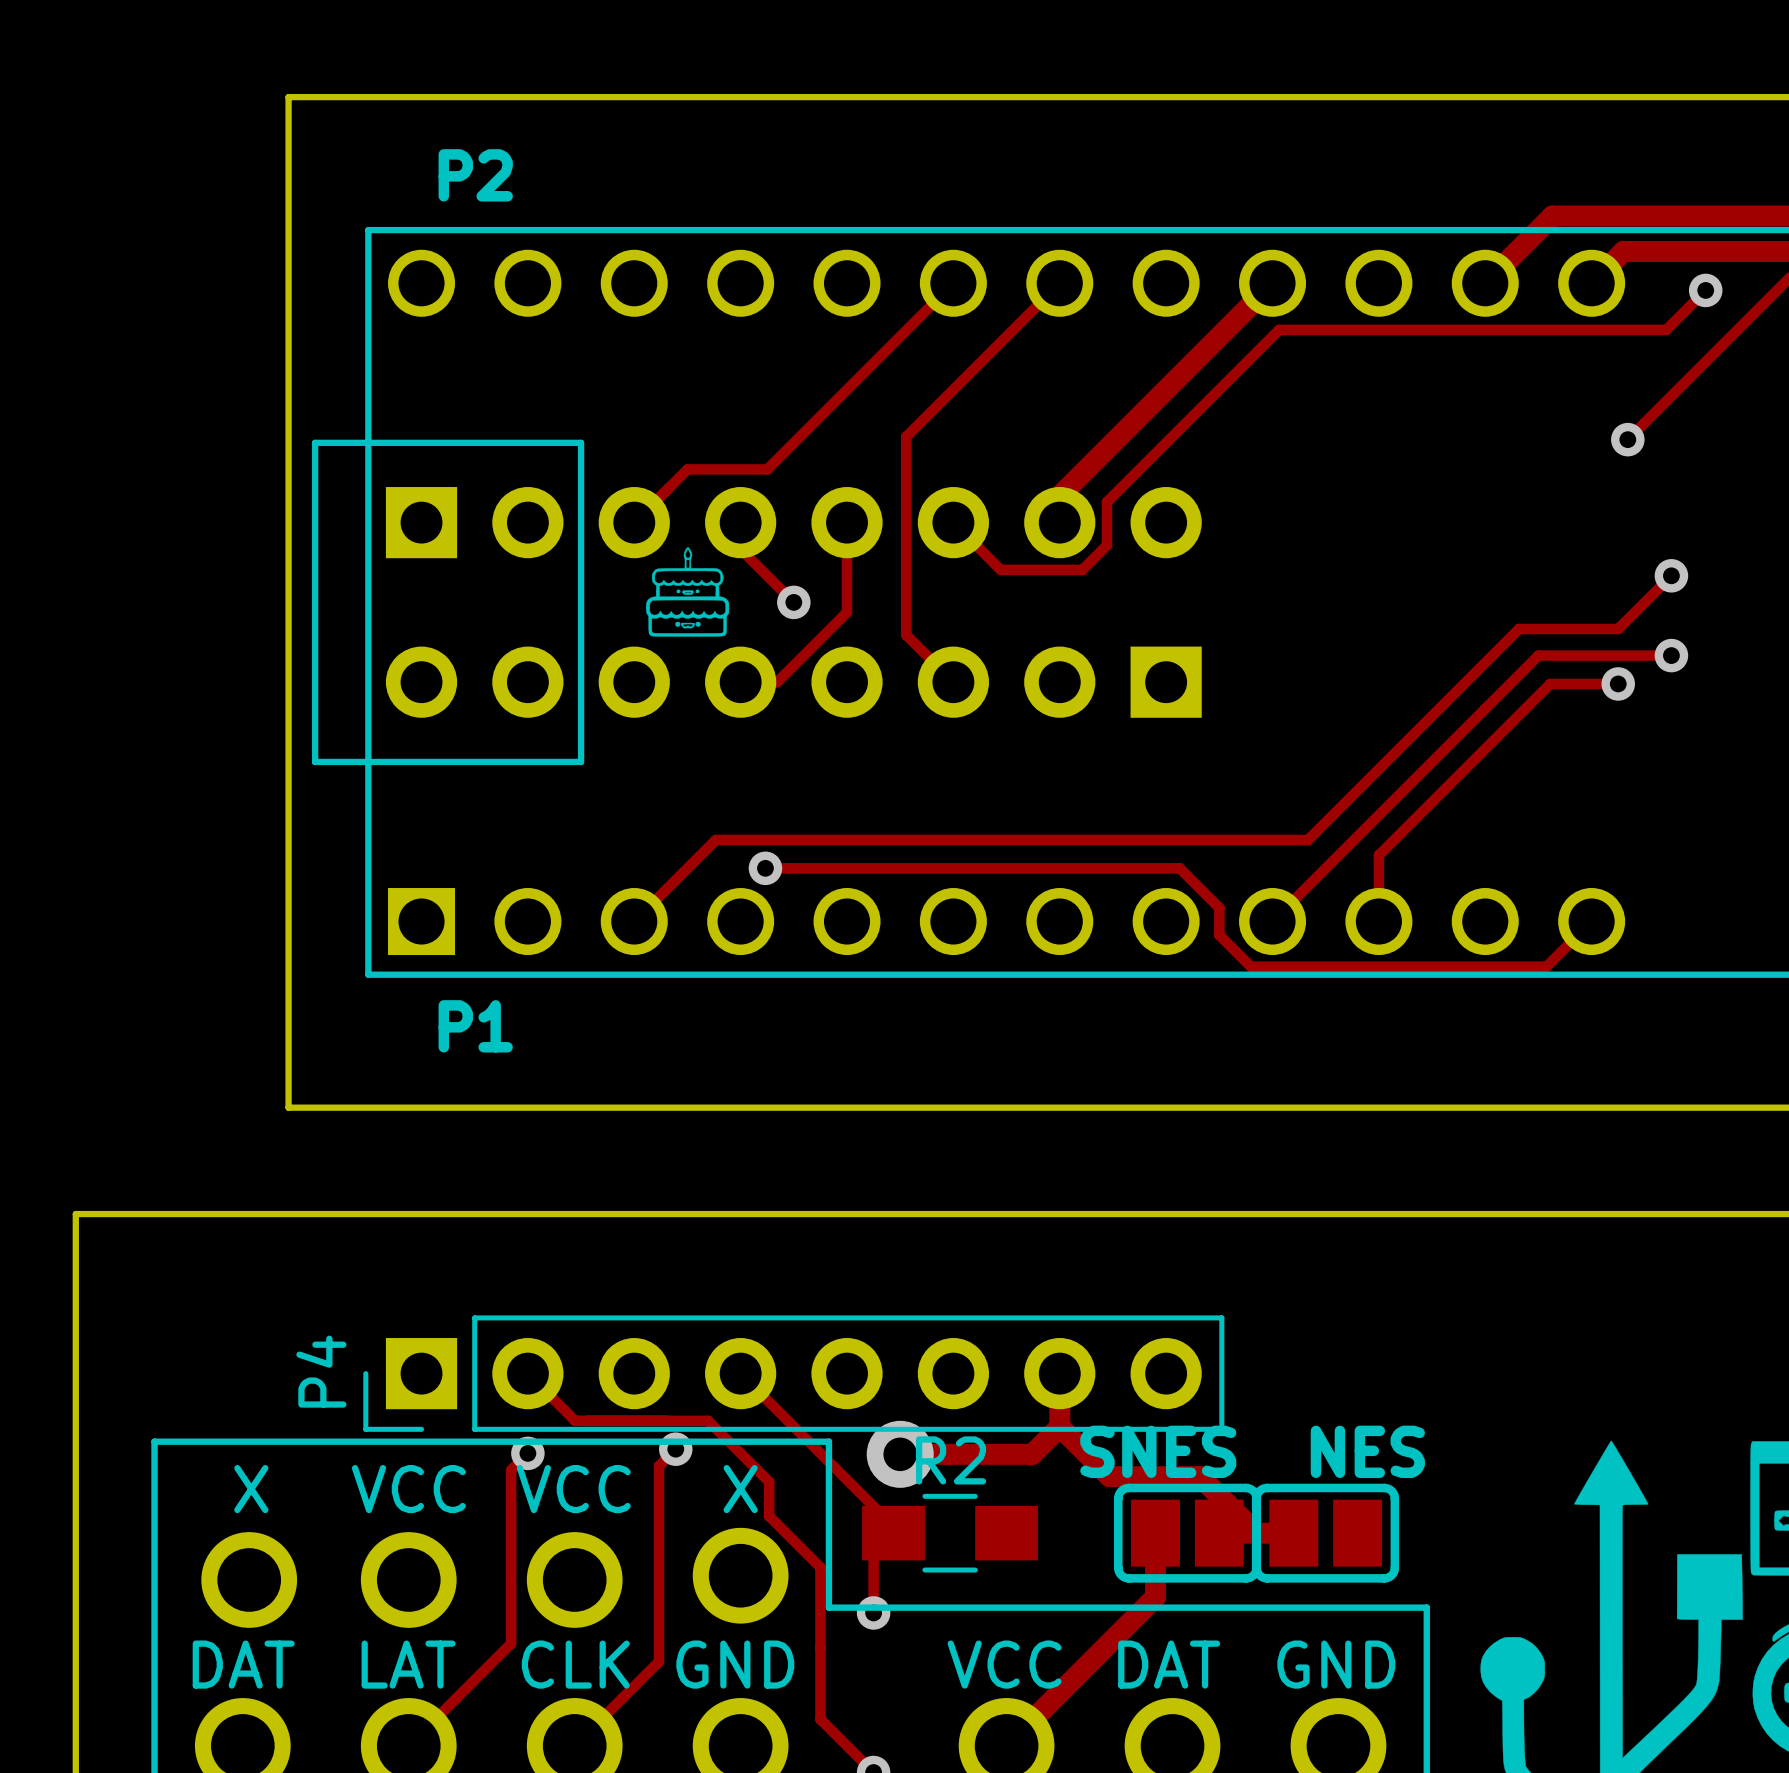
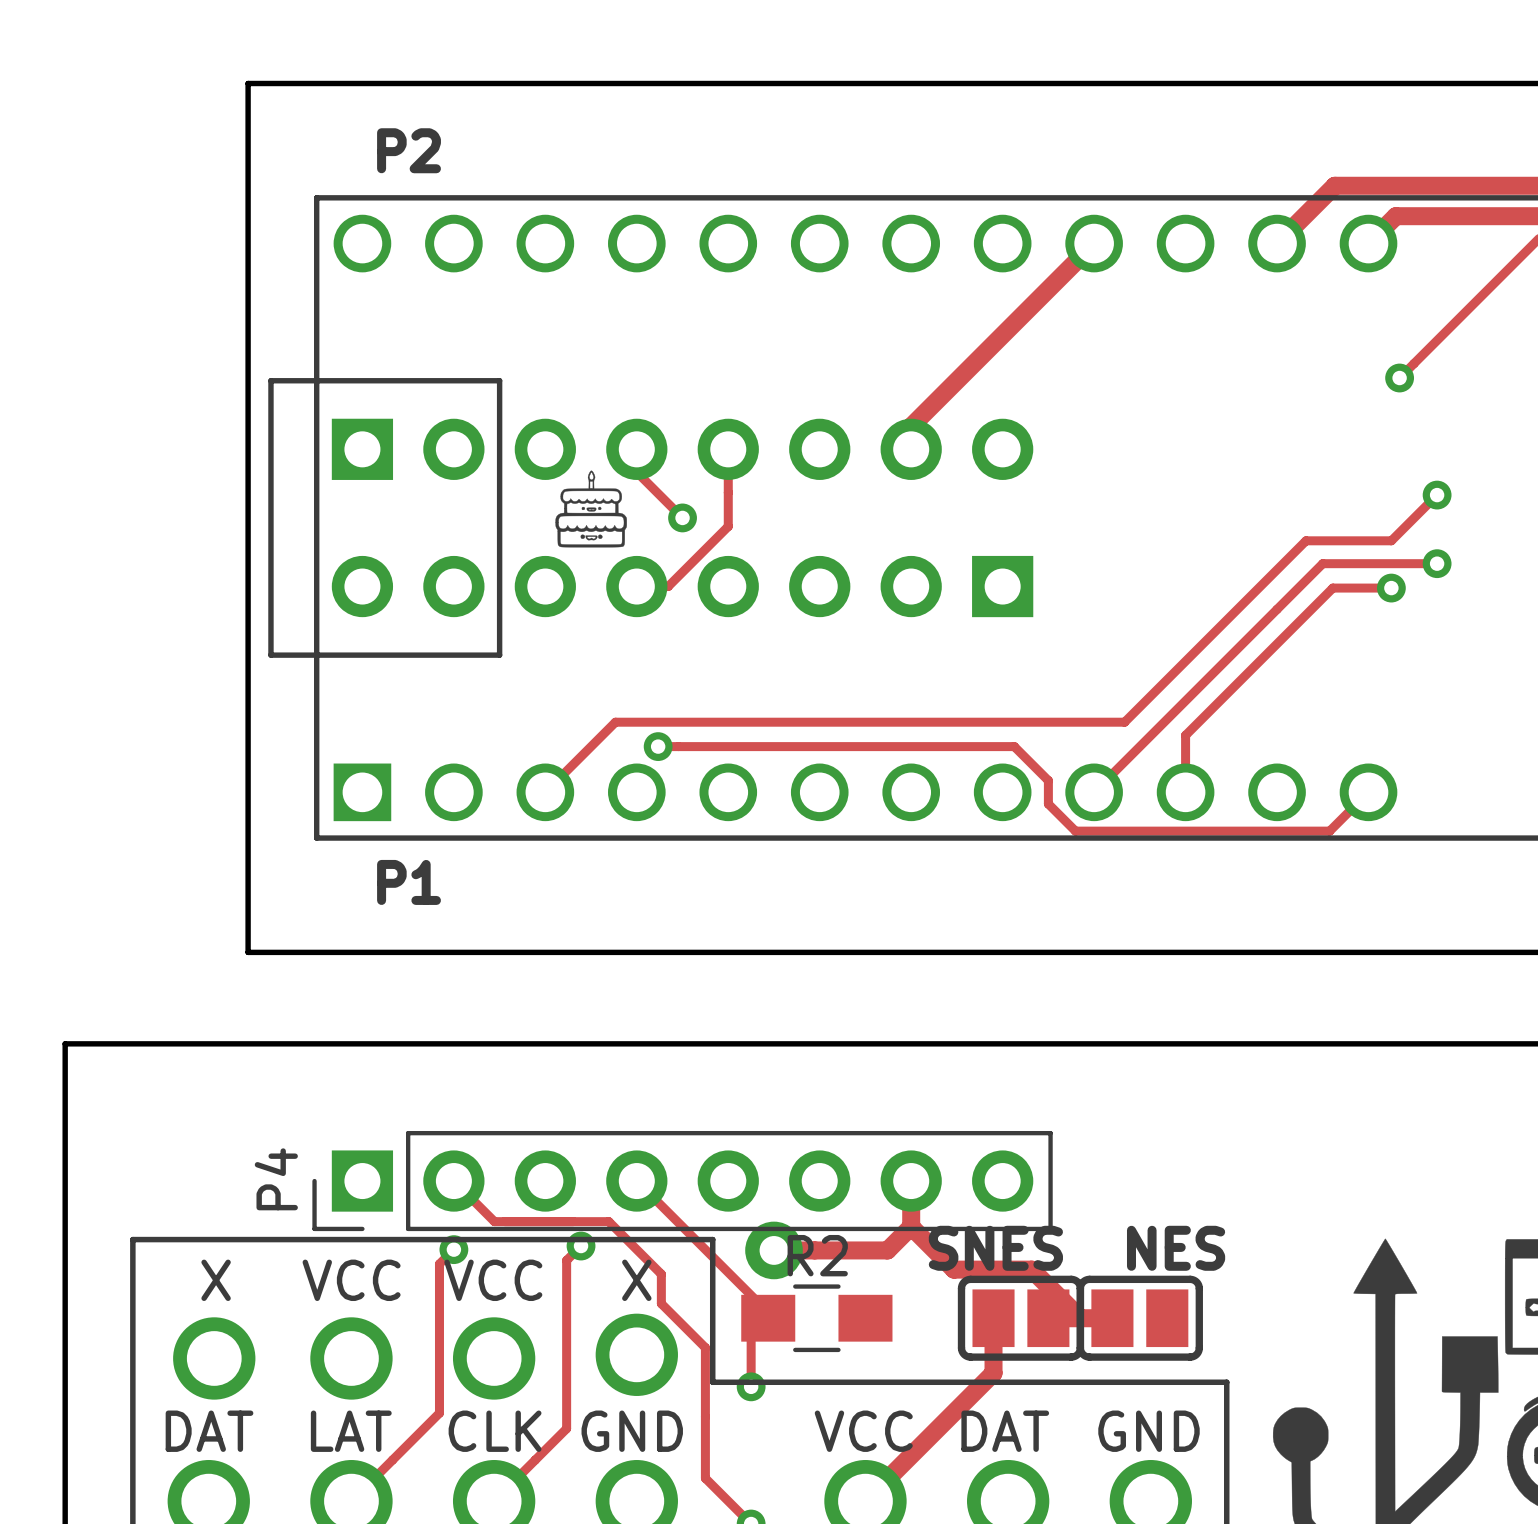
track: (953, 283) (767, 469) (687, 469) (634, 522) -> none
track: (1059, 283) (906, 436) (906, 634) (953, 682) -> none
track: (1705, 290) (1666, 329) (1279, 329) (1106, 501) (1106, 545) (1082, 569) (1000, 569) (953, 522) -> none
via: (1705, 290) -> none

